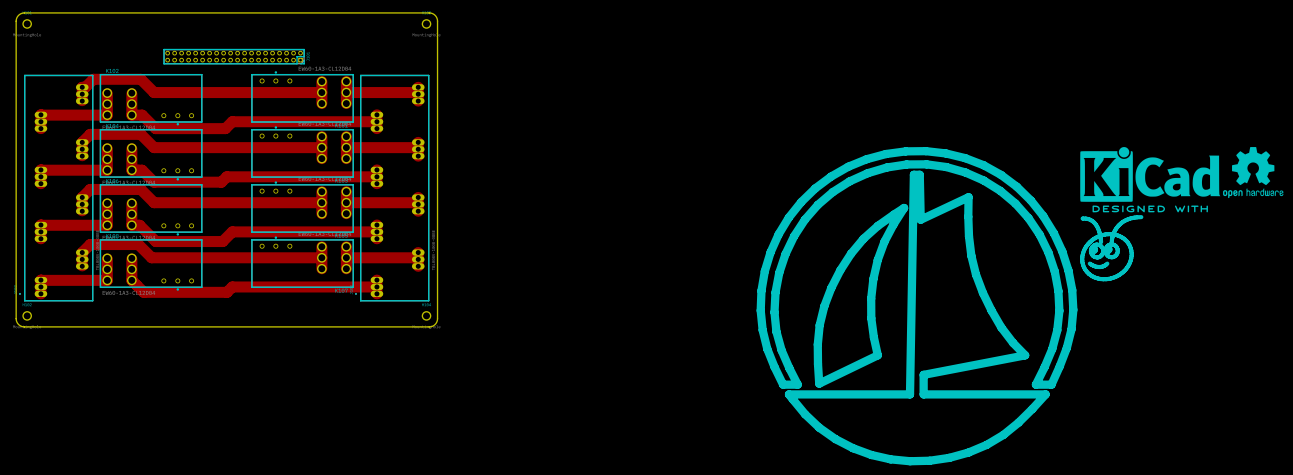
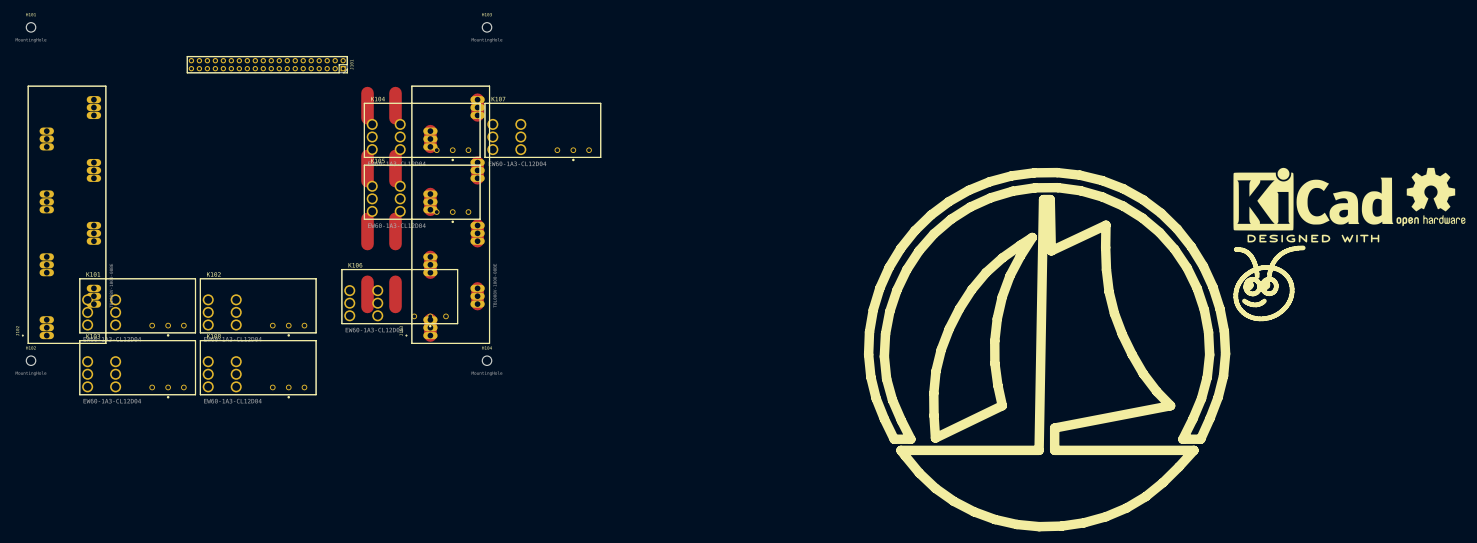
board edge: (24, 12) (429, 12) (434, 14) (437, 21) (437, 318) (435, 323) (429, 326) (24, 326) (19, 325) (16, 318) (16, 21) (18, 15) (24, 12) -> none
track: (321, 92) (154, 92) (140, 79) (93, 79) (85, 87) (82, 87) (82, 100) -> none
track: (346, 92) (416, 92) (418, 94) -> none
track: (107, 93) (107, 115) (40, 114) (40, 128) -> none
track: (131, 93) (131, 115) (142, 115) (155, 128) (225, 128) (232, 121) (376, 121) -> none
part rotation: 0° (302, 96) -> 180° (137, 307)
part position: (302, 96) -> (137, 307)
part position: (151, 99) -> (258, 307)
track: (321, 147) (154, 147) (140, 134) (90, 134) (82, 142) (82, 155) -> none
track: (346, 147) (416, 147) (418, 149) -> none
track: (107, 148) (107, 170) (40, 169) (40, 183) -> none
track: (131, 148) (131, 170) (142, 170) (154, 182) (221, 182) (226, 176) (376, 176) -> none
part rotation: 0° (302, 151) -> 180° (137, 369)
part position: (302, 151) -> (137, 369)
part position: (151, 154) -> (422, 132)
track: (321, 202) (154, 202) (140, 189) (90, 189) (82, 197) (82, 210) -> none
track: (346, 202) (416, 202) (418, 204) -> none
track: (107, 203) (107, 225) (40, 225) (40, 238) -> none
track: (131, 203) (131, 225) (139, 225) (155, 241) (222, 241) (232, 231) (376, 231) -> none
part rotation: 0° (302, 206) -> 180° (422, 194)
part position: (302, 206) -> (422, 194)
part position: (151, 210) -> (399, 298)
track: (321, 257) (151, 257) (138, 244) (90, 244) (82, 252) (82, 265) -> none
track: (346, 257) (416, 257) (418, 259) -> none
track: (107, 259) (107, 280) (40, 280) (40, 293) -> none
track: (131, 259) (131, 280) (143, 292) (226, 292) (232, 286) (376, 286) -> none
part rotation: 0° (302, 262) -> 180° (542, 132)
part position: (302, 262) -> (542, 132)
part position: (151, 265) -> (258, 369)

